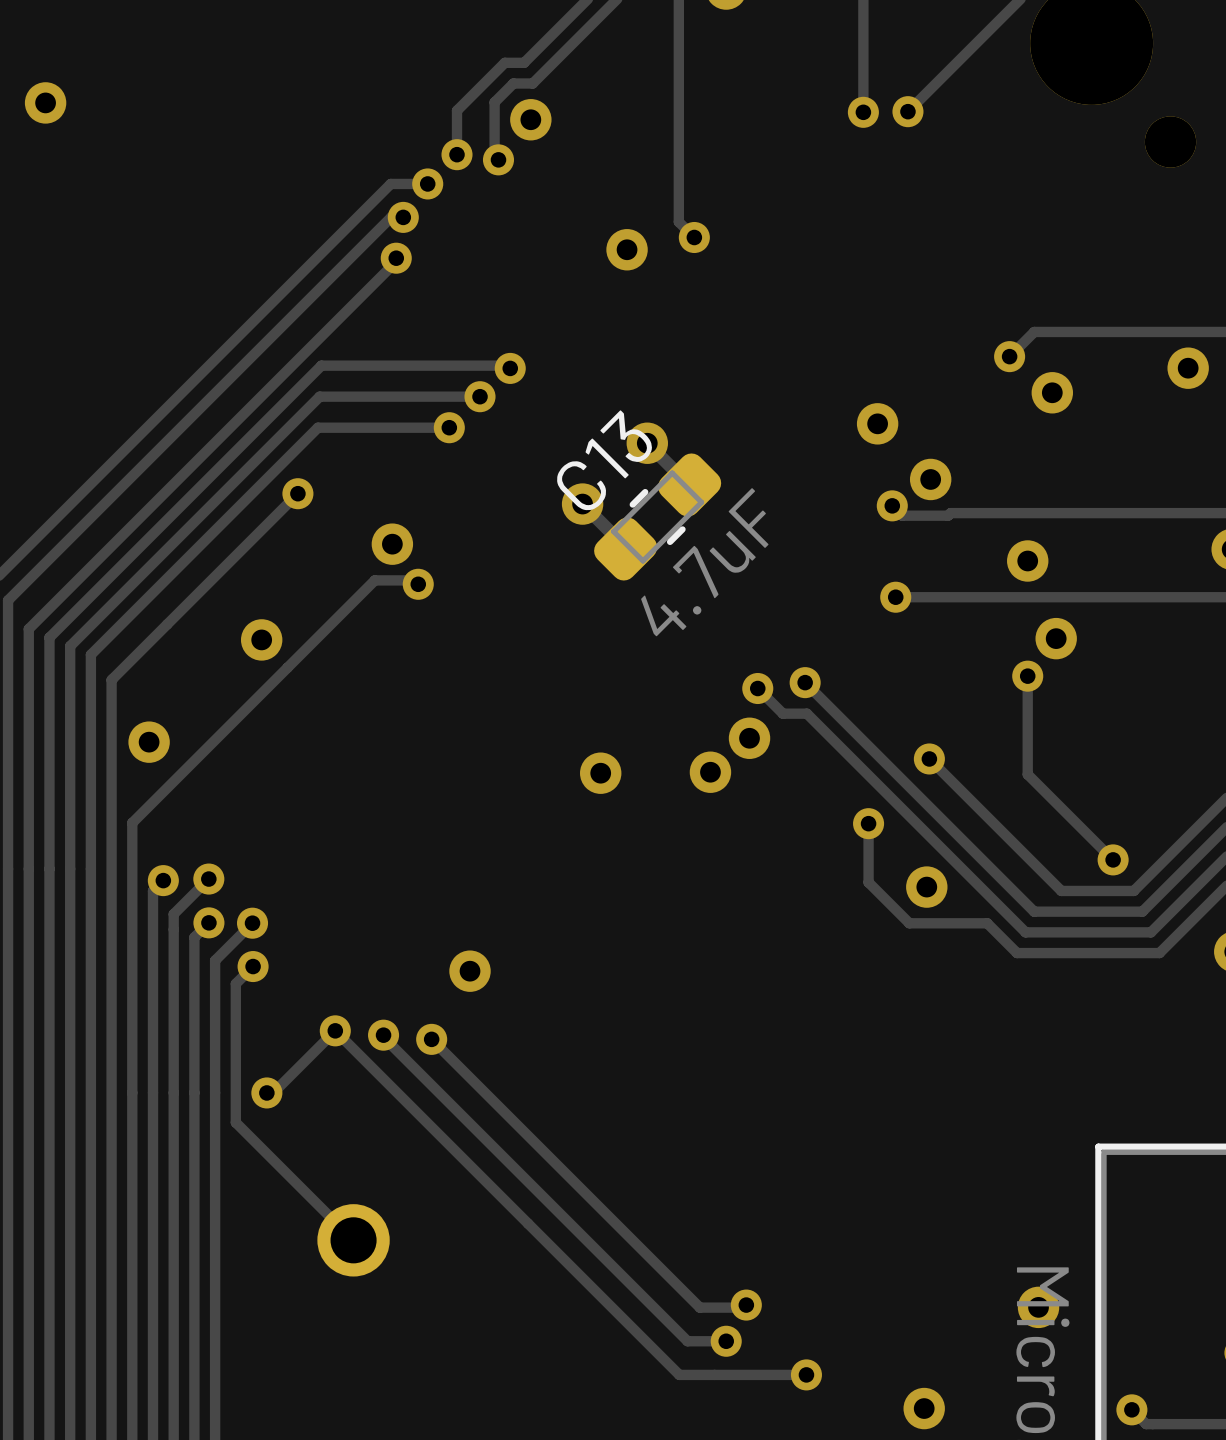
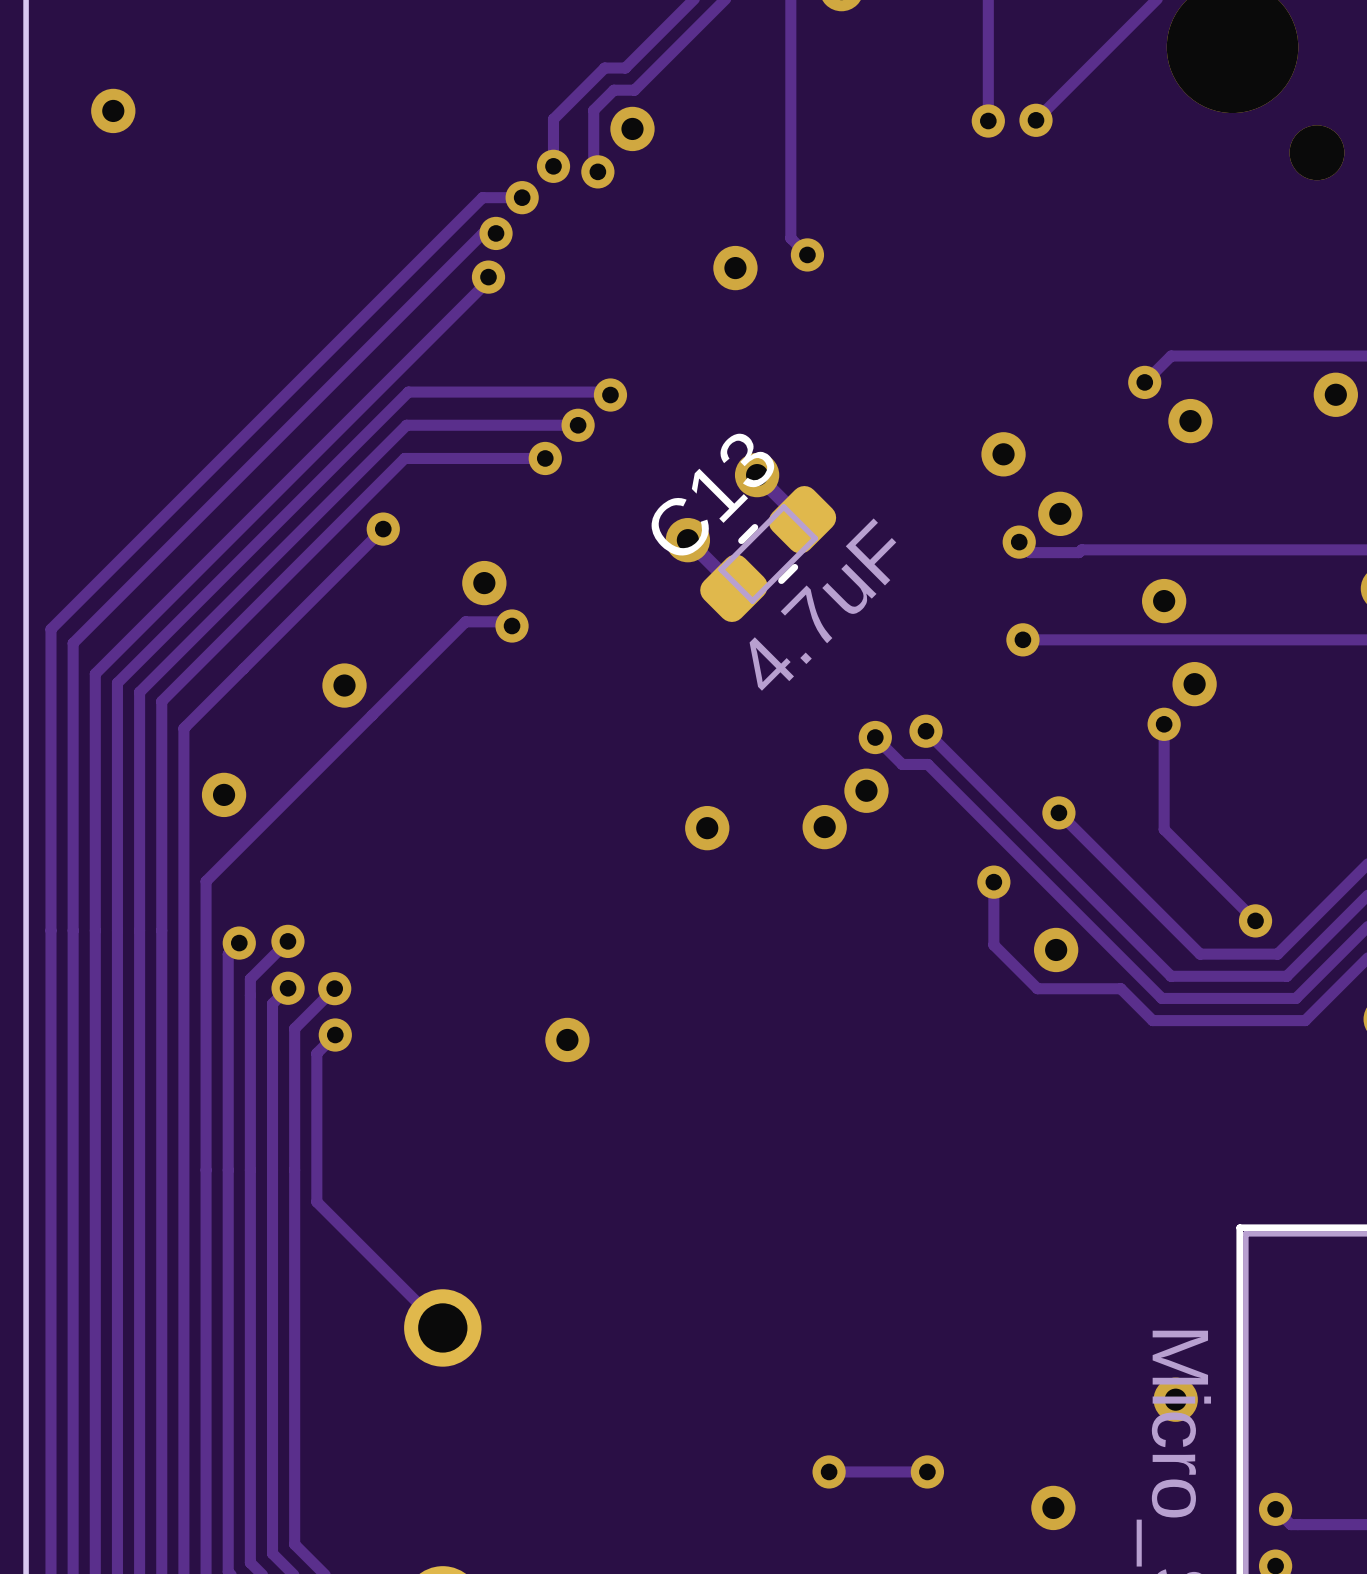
via: (335, 1030) -> none
track: (383, 1035) (687, 1341) (726, 1341) -> none
via: (383, 1035) -> none
track: (431, 1039) (699, 1307) (743, 1307) (746, 1305) -> none
via: (431, 1039) -> none
track: (266, 1092) (273, 1092) (335, 1030) (679, 1374) (714, 1374) -> none
via: (266, 1092) -> none
via: (746, 1305) -> none
via position: (726, 1341) -> (829, 1471)

